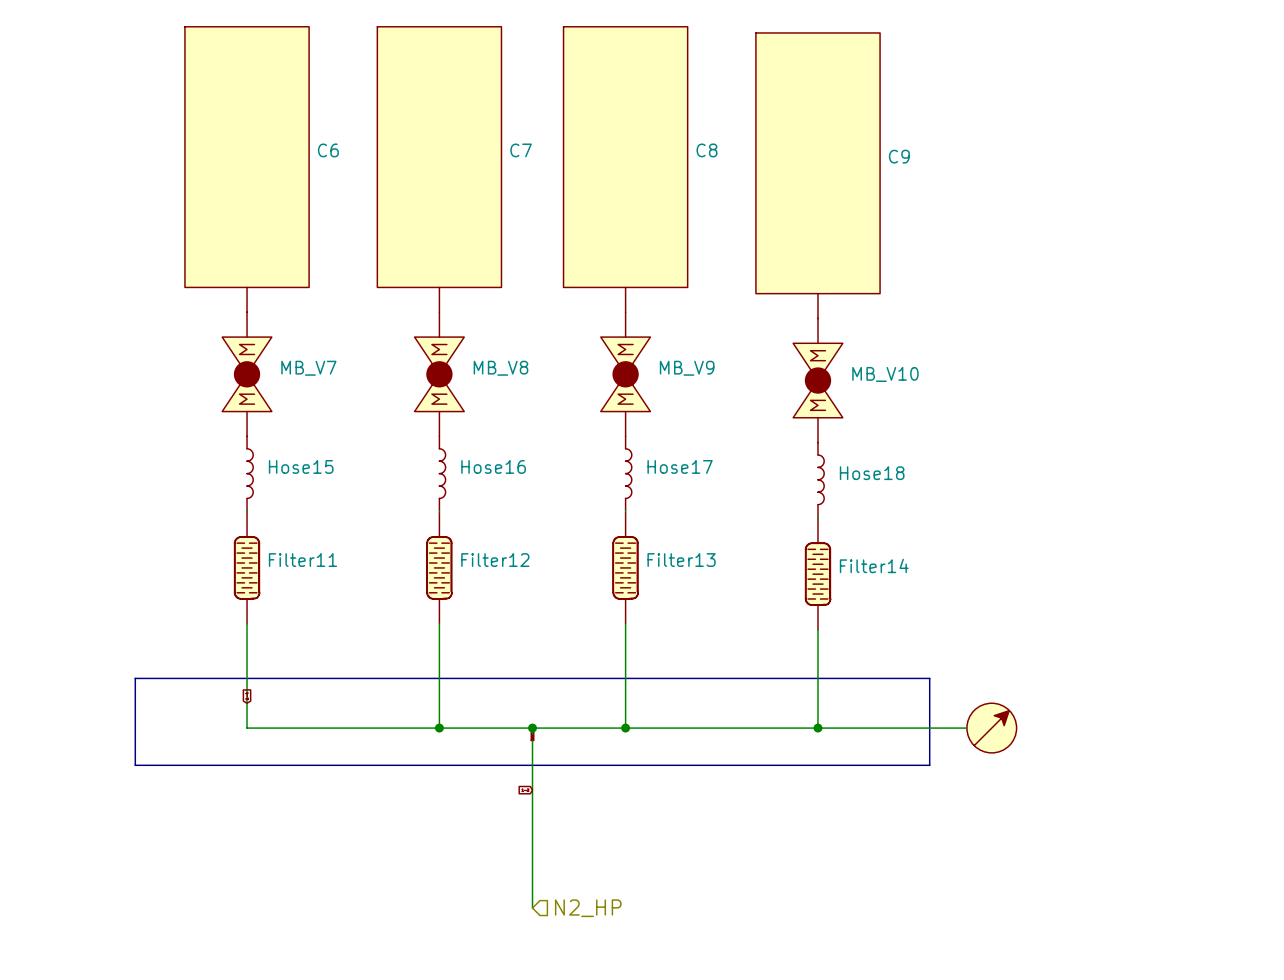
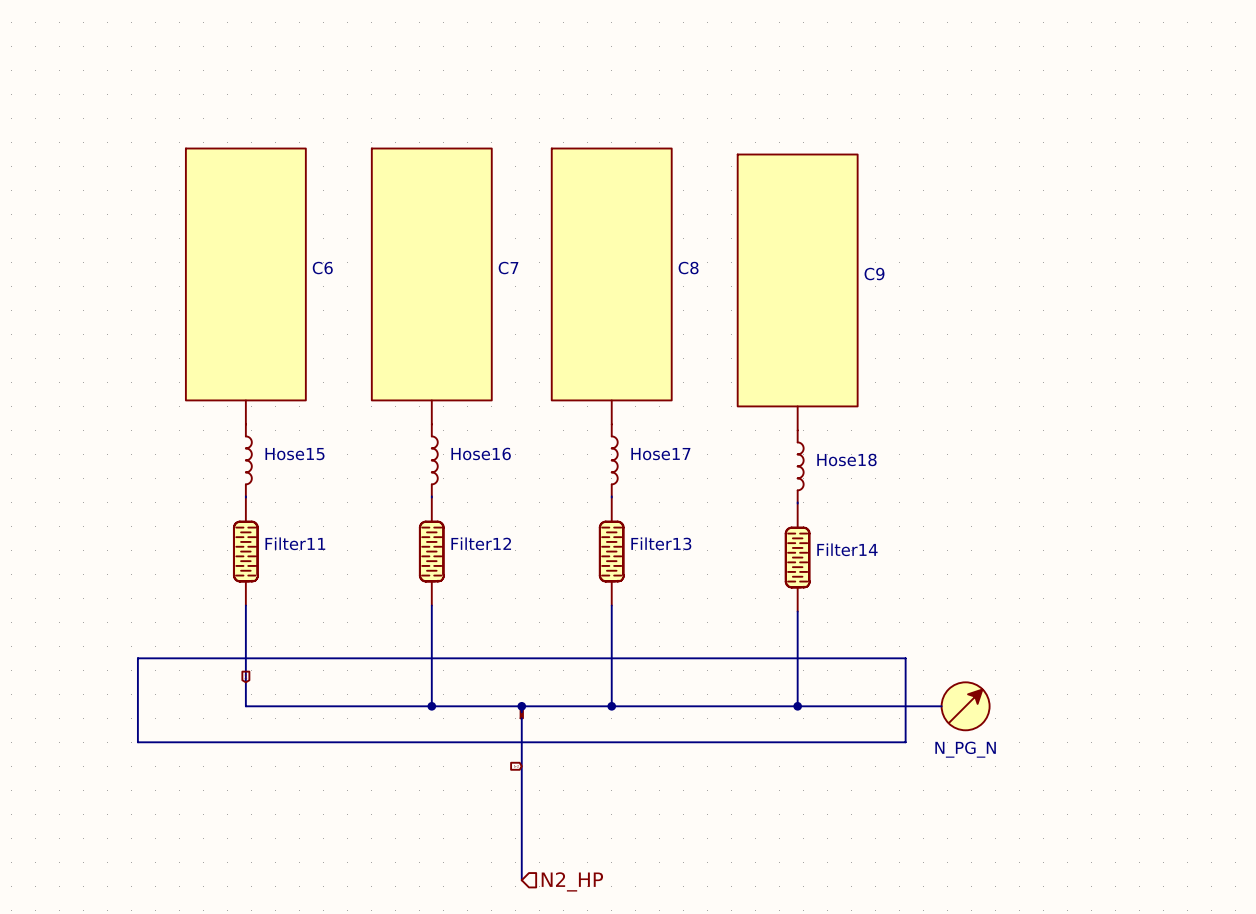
C6 position: (247, 169) -> (245, 286)
C7 position: (439, 169) -> (431, 286)
C8 position: (625, 169) -> (611, 286)
C9 position: (817, 175) -> (797, 292)
MB_V7: (247, 374) -> none
MB_V8: (439, 374) -> none
MB_V9: (625, 374) -> none
MB_V10: (817, 380) -> none
part text: none -> N_PG_N (965, 749)

